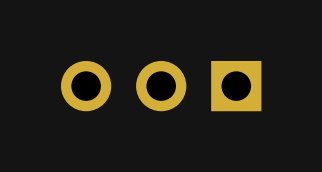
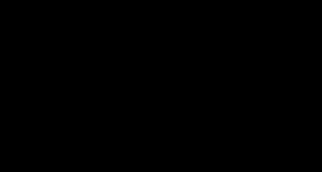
part: (161, 86) -> none

